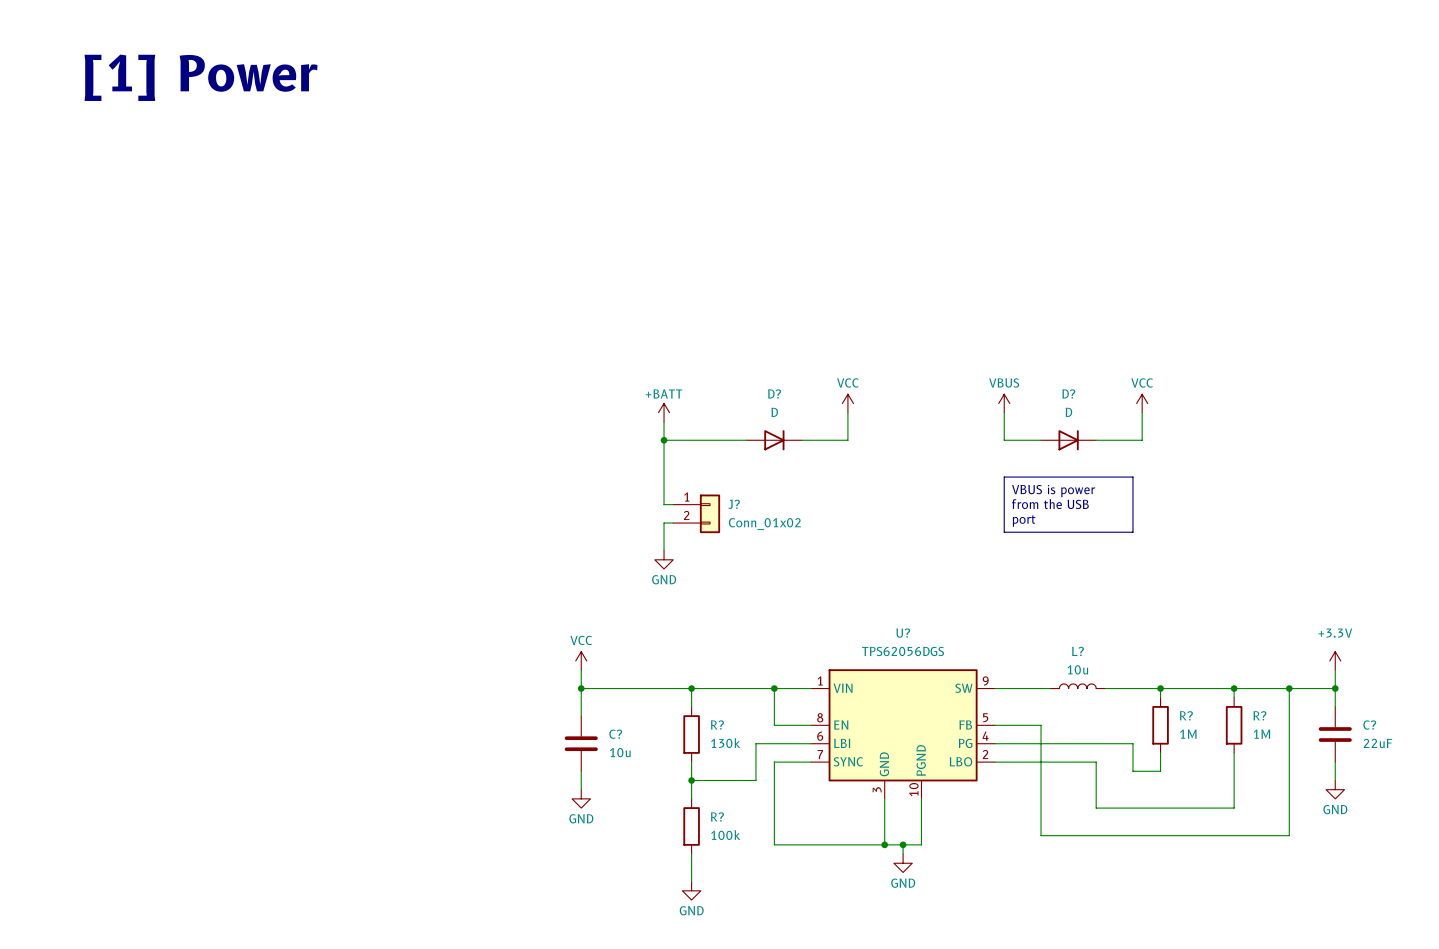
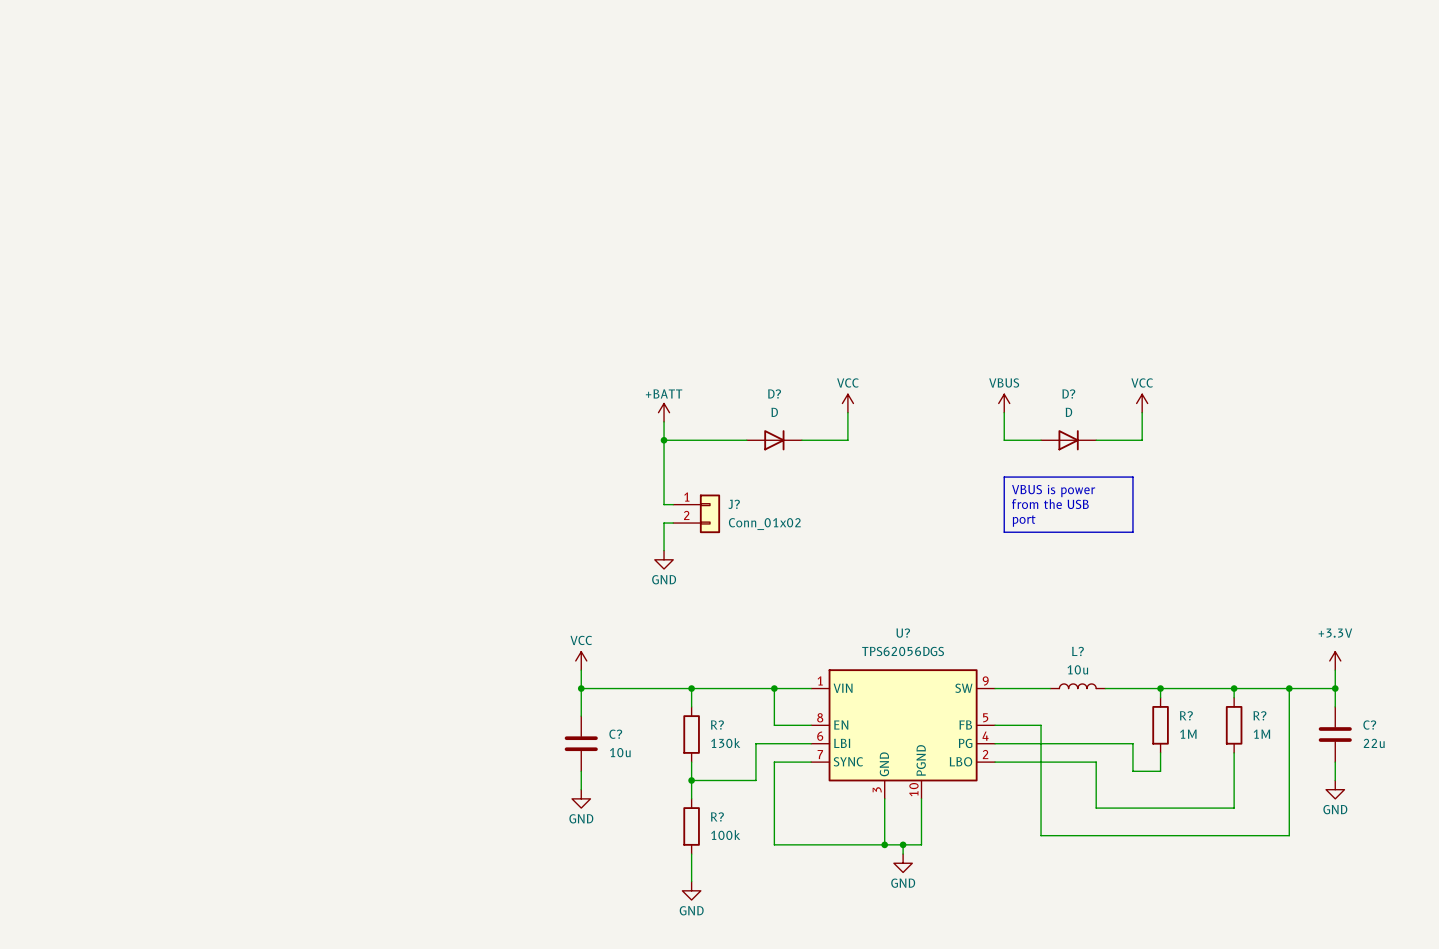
text: [1] Power (201, 77) -> none
C? value: 22uF (1377, 743) -> 22u (1374, 743)

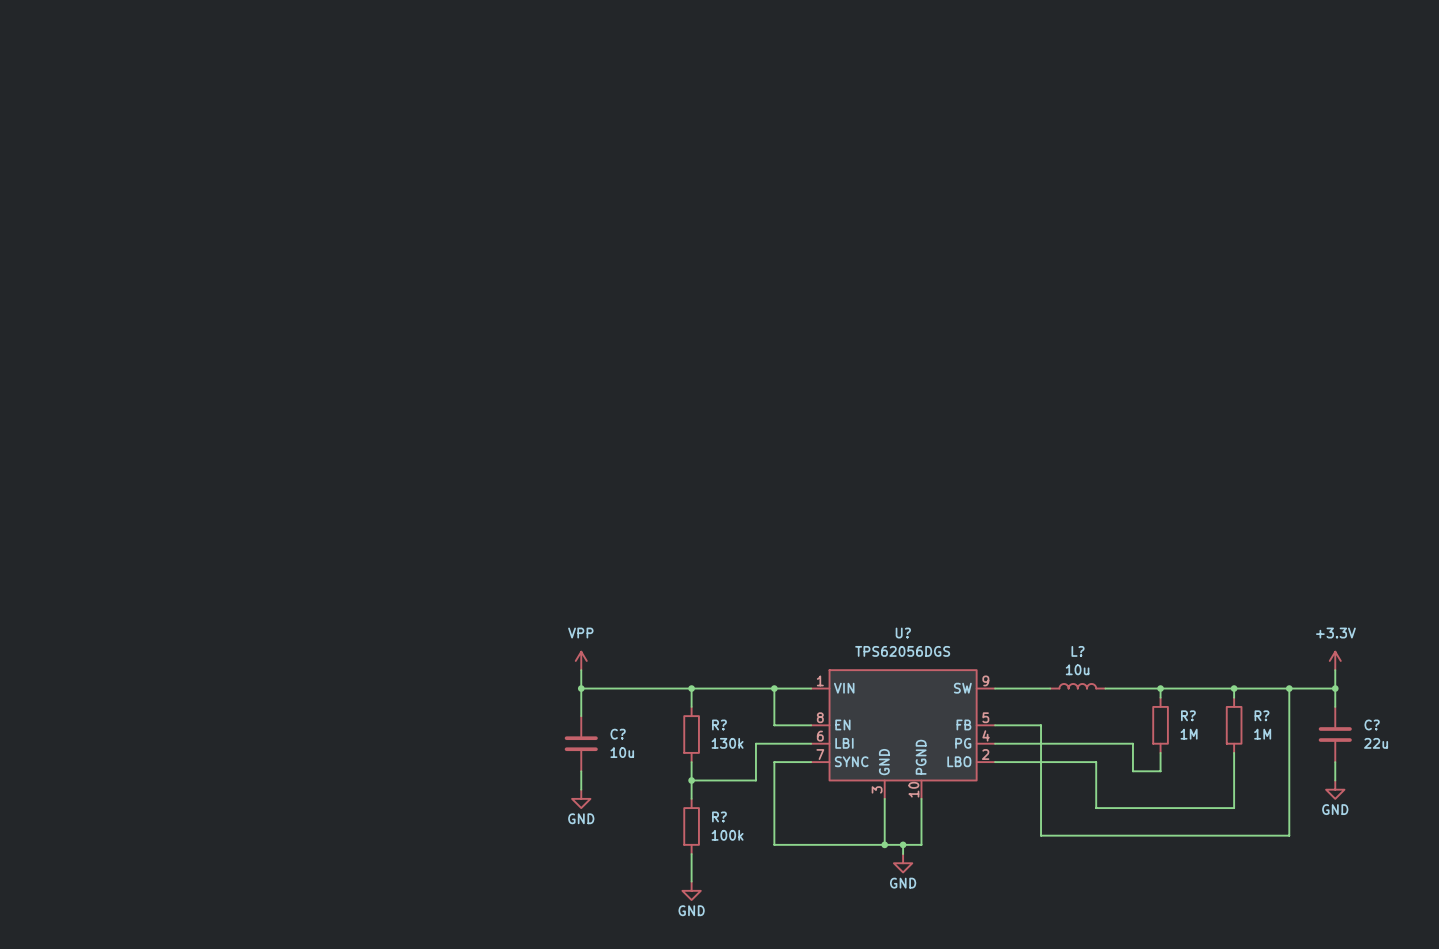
power symbol: VCC (847, 403) -> none
power symbol: VBUS (1004, 403) -> none
power symbol: VCC (1142, 403) -> none
power symbol: +BATT (664, 412) -> none
wire: (847, 412) (847, 440) (801, 440) -> none
wire: (1004, 412) (1004, 440) (1041, 440) -> none
wire: (1142, 412) (1142, 440) (1096, 440) -> none
wire: (664, 421) (664, 504) (673, 504) -> none
wire: (664, 440) (746, 440) -> none
junction: (664, 440) -> none
D?: D (774, 440) -> none
D?: D (1068, 440) -> none
line: (1004, 477) (1132, 477) (1132, 532) (1004, 532) (1004, 477) -> none
text: VBUS is power (1053, 491) -> none
text: from the USB (1050, 504) -> none
J?: Conn_01x02 (696, 513) -> none
text: port (1024, 520) -> none
wire: (673, 523) (664, 523) (664, 550) -> none
power symbol: GND (664, 559) -> none
power symbol: VCC (581, 660) -> VPP (581, 660)

